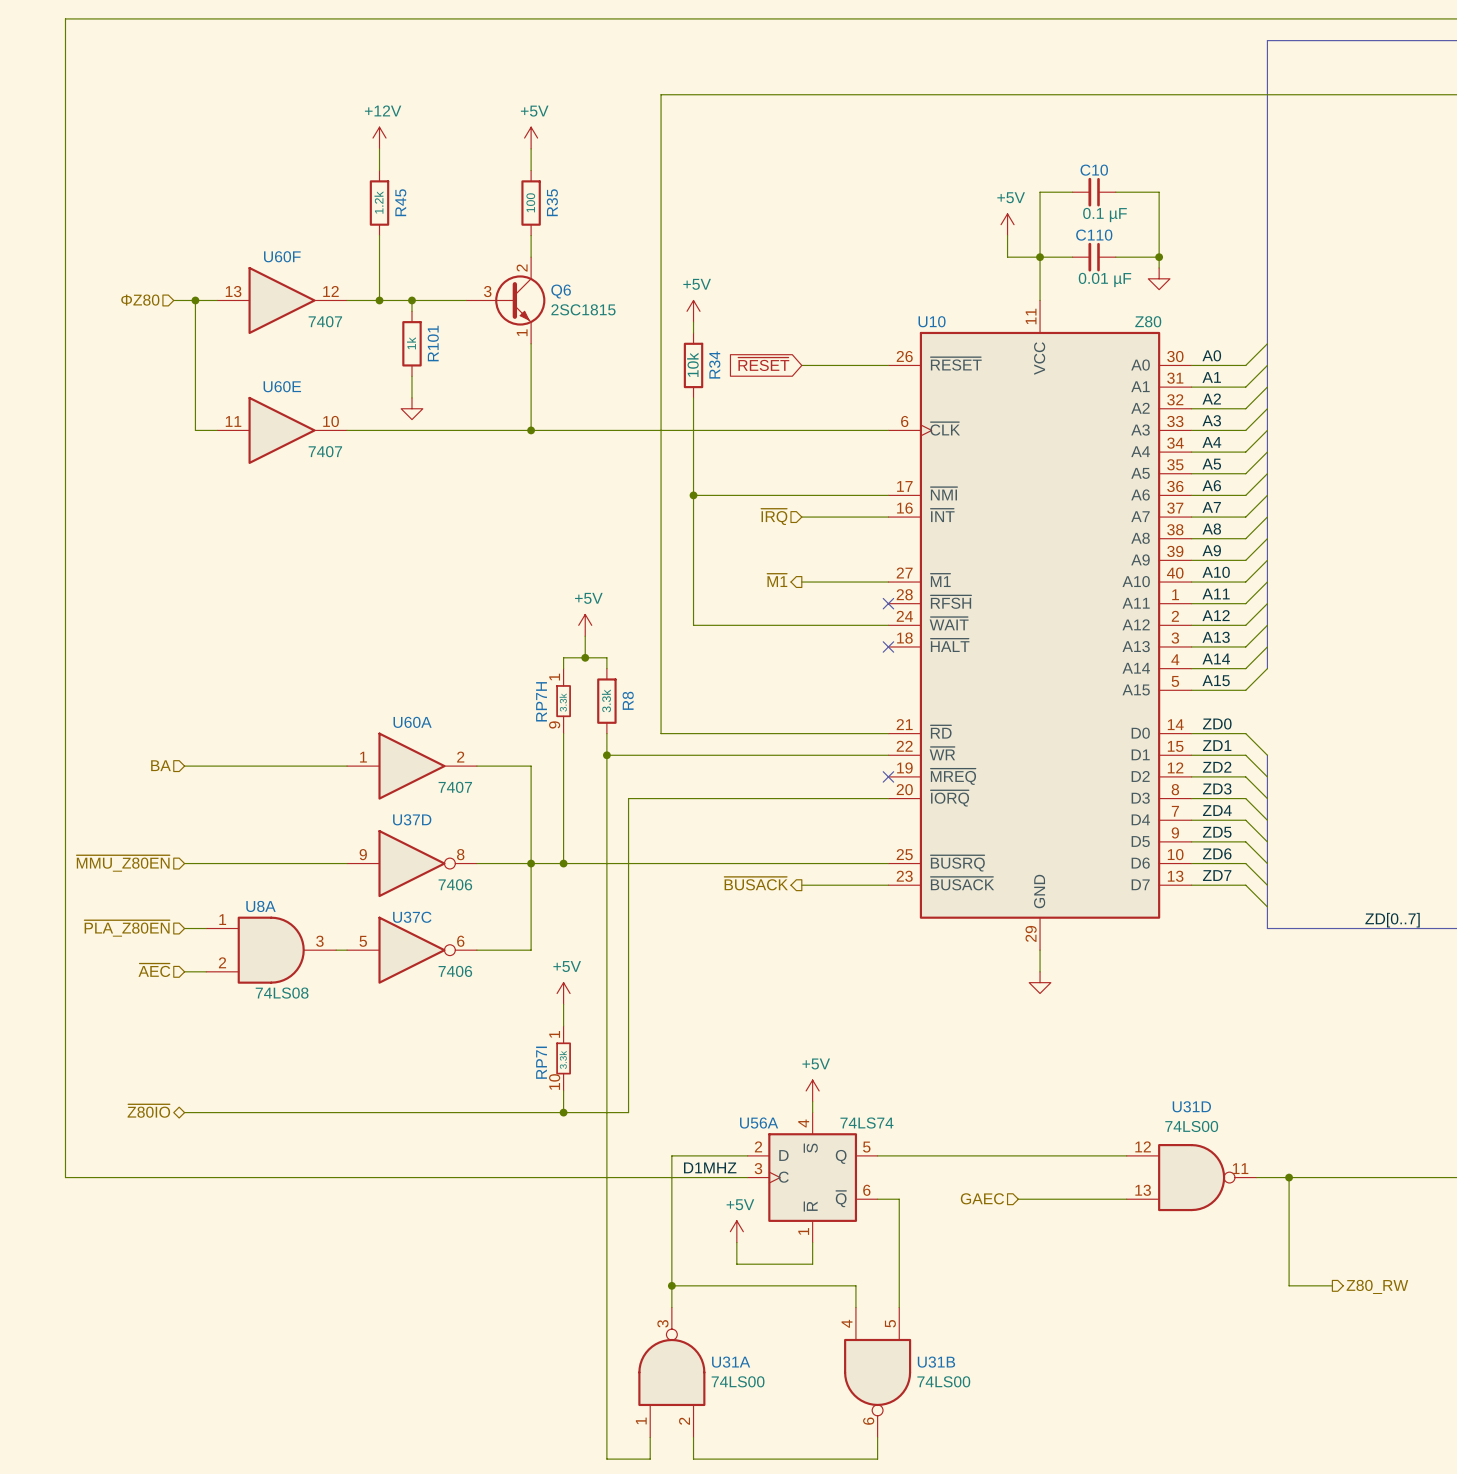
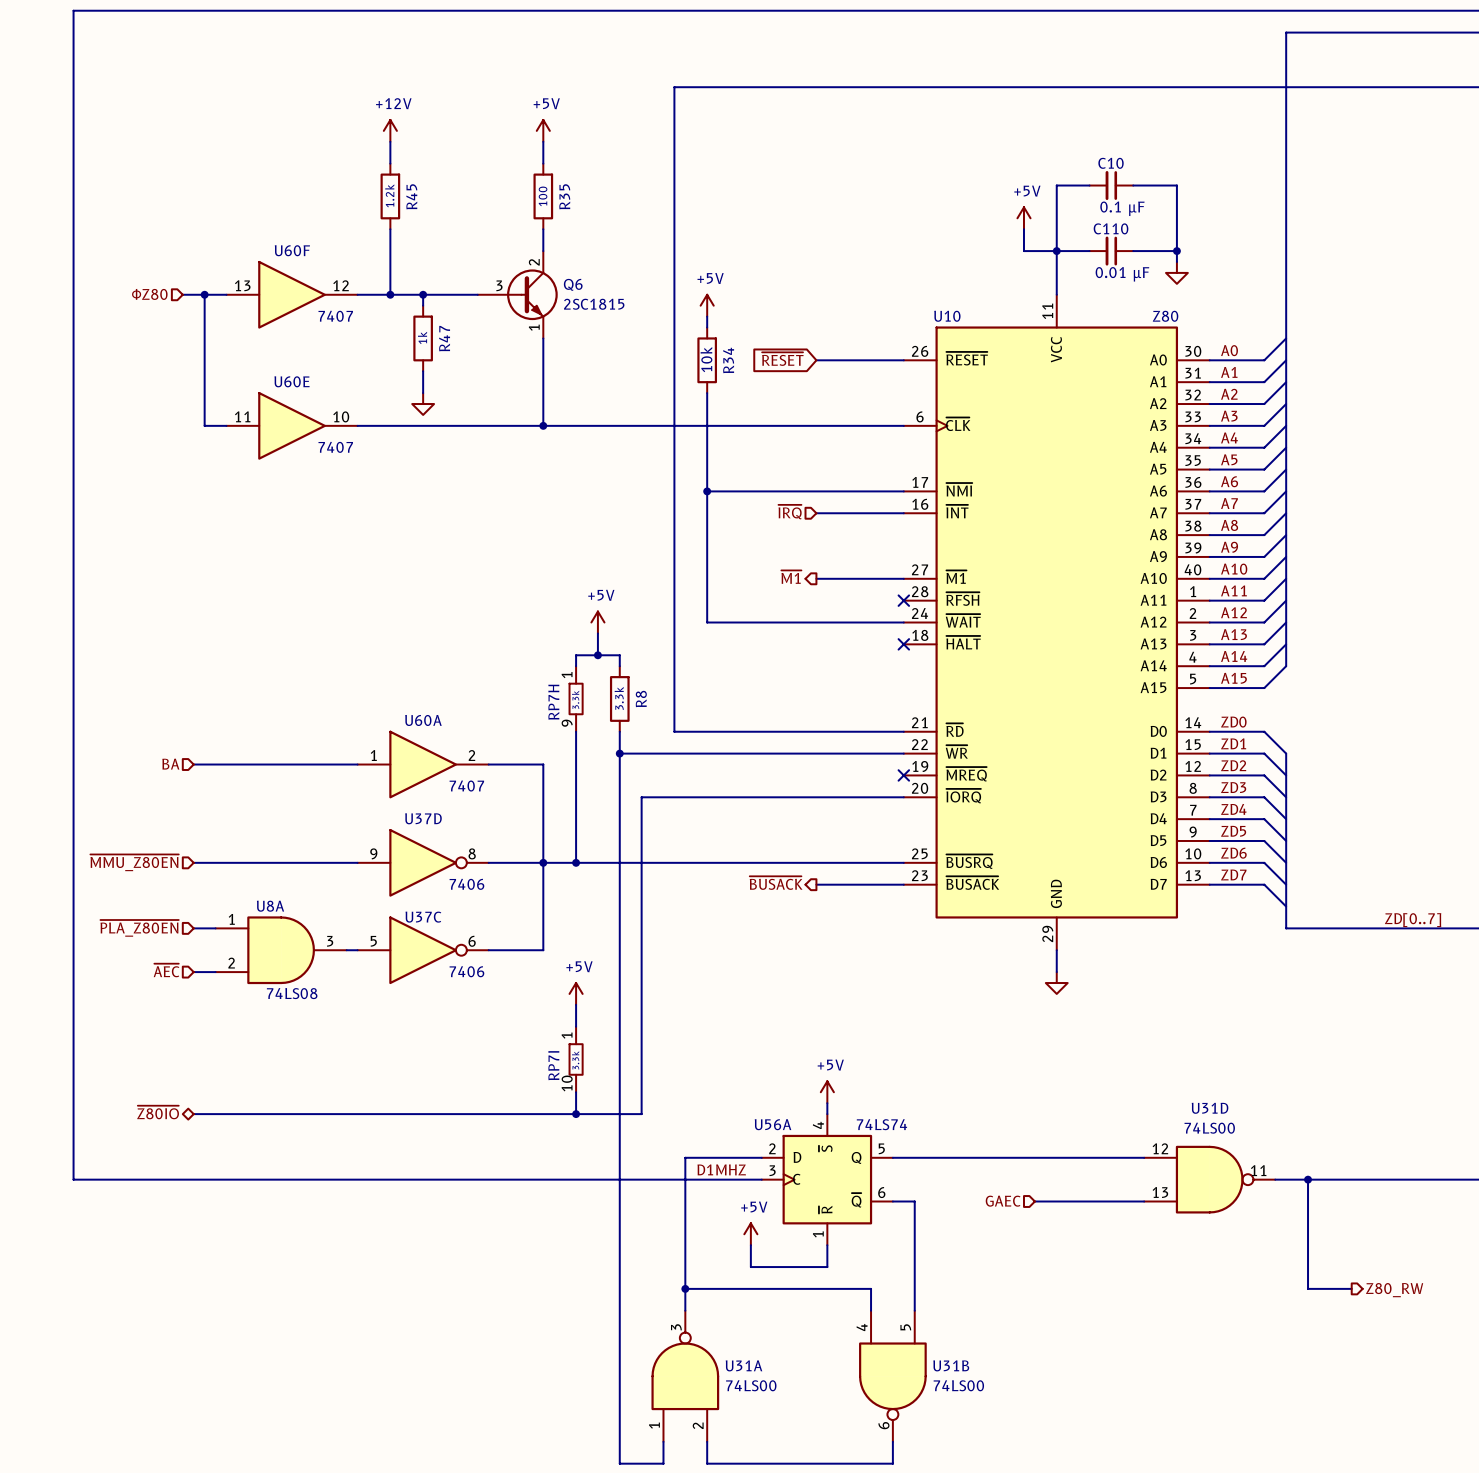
R101 name: R101 (433, 343) -> R47 (444, 338)

